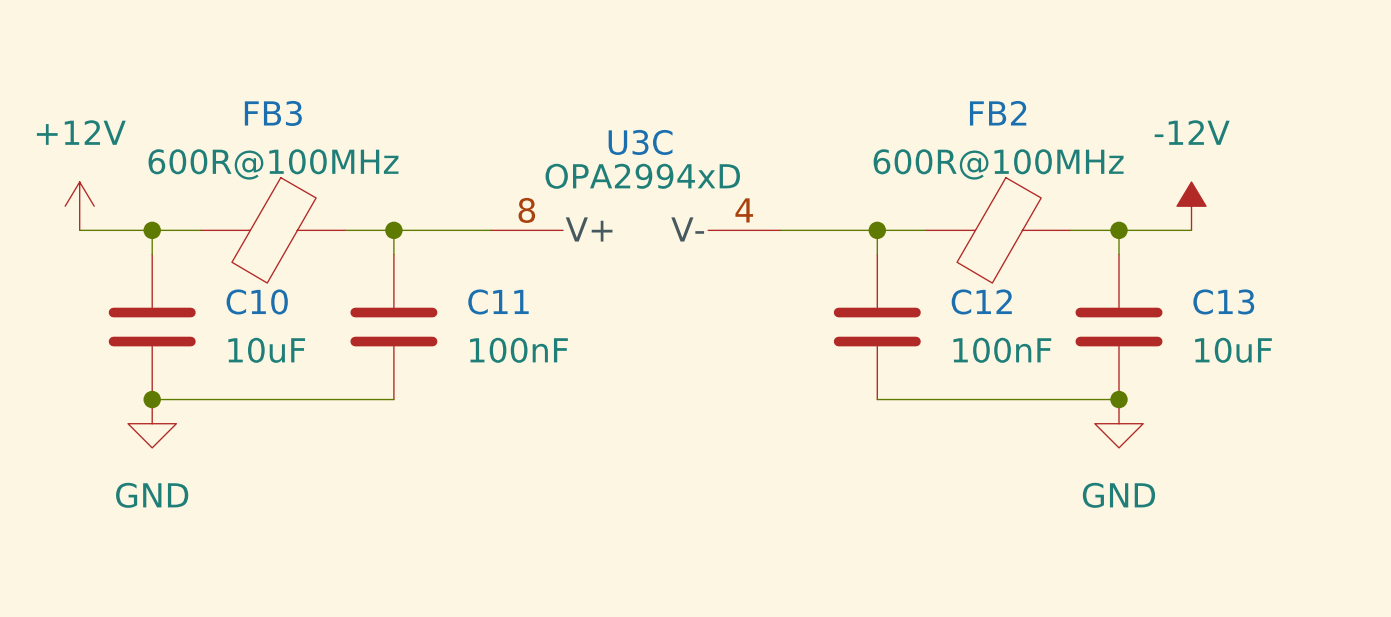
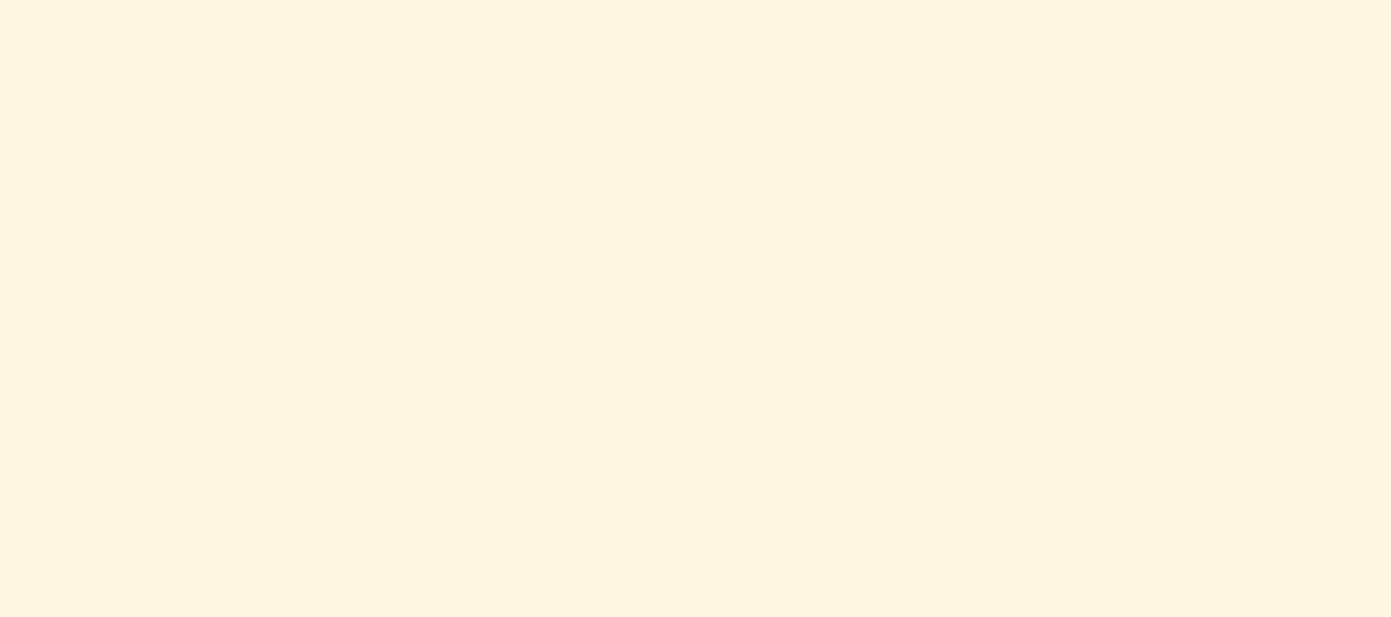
power symbol: +12V (79, 206) -> none
power symbol: -12V (1191, 206) -> none
wire: (79, 230) (200, 230) -> none
wire: (152, 230) (152, 254) -> none
junction: (152, 230) -> none
FB3: 600R@100MHz (273, 230) -> none
wire: (345, 230) (490, 230) -> none
wire: (393, 230) (393, 254) -> none
junction: (393, 230) -> none
U3C: OPA2994xD (635, 230) -> none
wire: (780, 230) (925, 230) -> none
wire: (877, 230) (877, 254) -> none
junction: (877, 230) -> none
FB2: 600R@100MHz (998, 230) -> none
wire: (1070, 230) (1191, 230) -> none
wire: (1119, 230) (1119, 254) -> none
junction: (1119, 230) -> none
C10: 10uF (152, 327) -> none
C11: 100nF (393, 327) -> none
C12: 100nF (877, 327) -> none
C13: 10uF (1119, 327) -> none
wire: (152, 399) (393, 399) -> none
junction: (152, 399) -> none
wire: (877, 399) (1119, 399) -> none
junction: (1119, 399) -> none
power symbol: GND (152, 423) -> none
power symbol: GND (1119, 423) -> none

